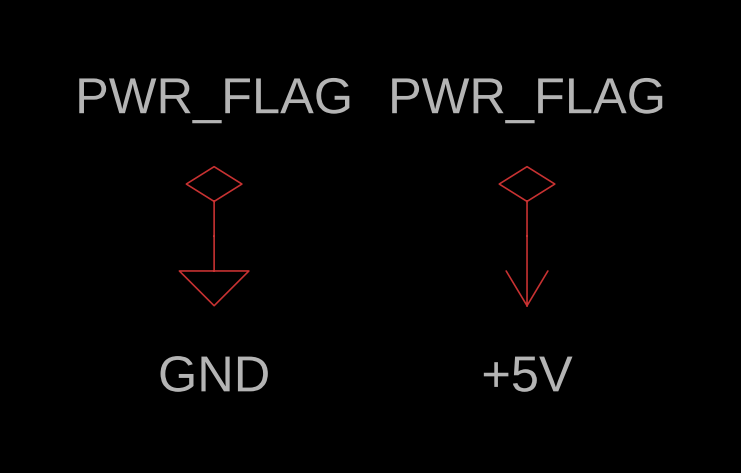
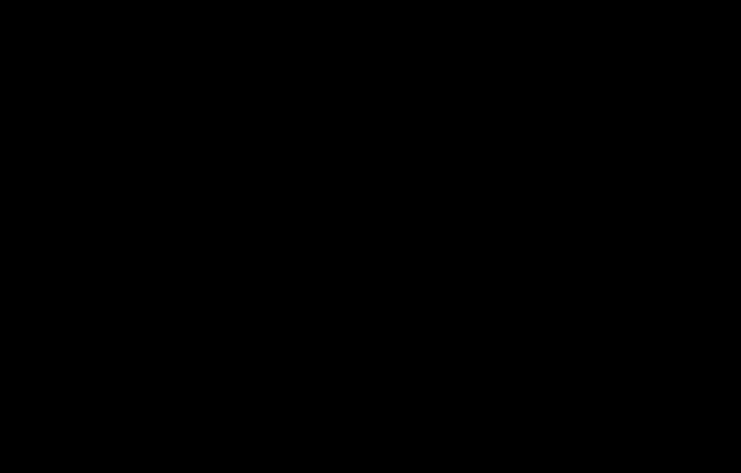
power symbol: PWR_FLAG (214, 201) -> none
power symbol: PWR_FLAG (527, 201) -> none
power symbol: GND (214, 270) -> none
power symbol: +5V (527, 270) -> none

